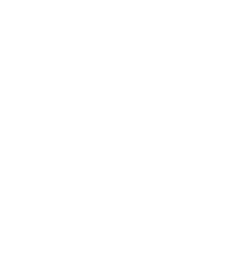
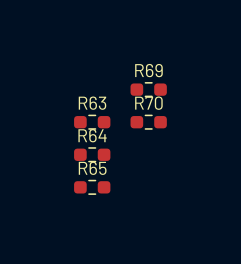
R69: none -> (148, 89)
R63: none -> (92, 122)
R70: none -> (148, 122)
R64: none -> (92, 154)
R65: none -> (92, 187)

